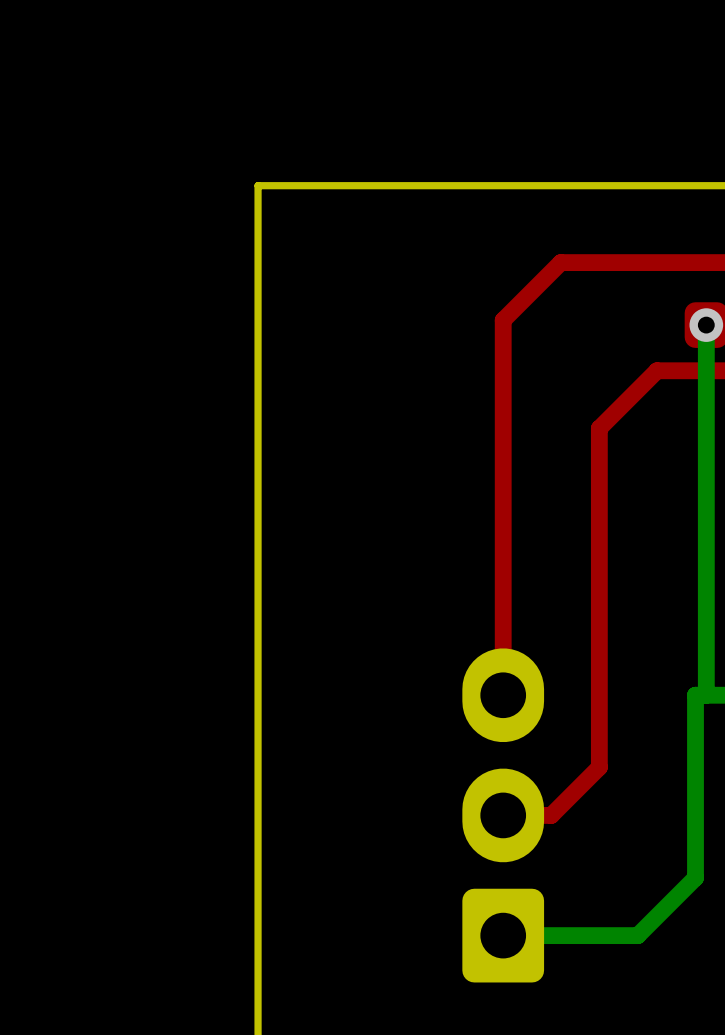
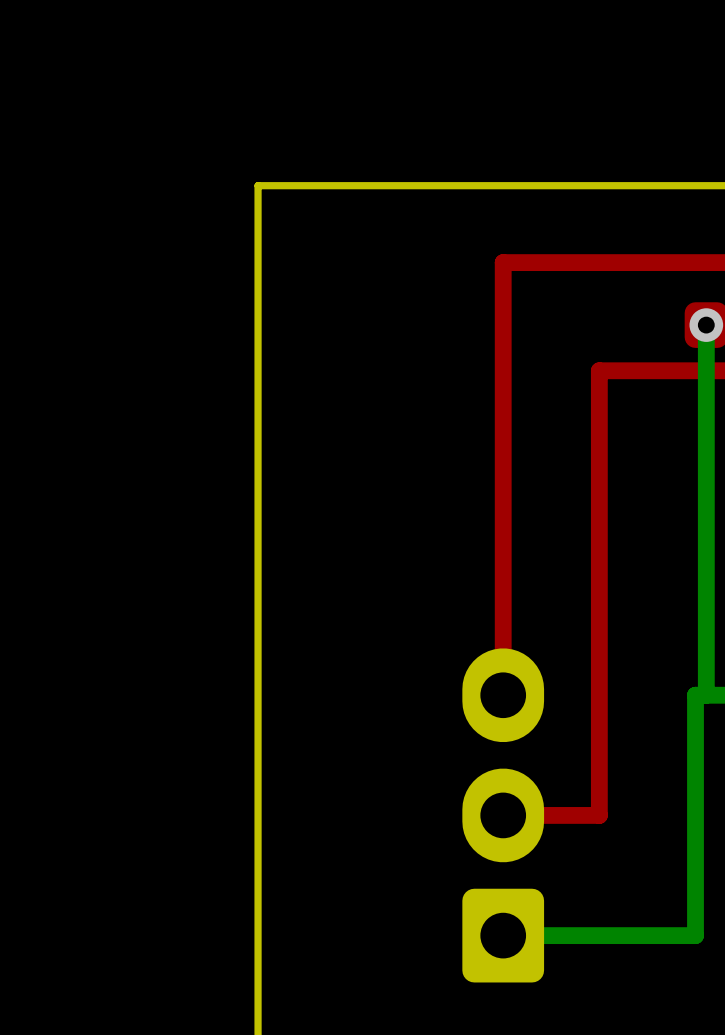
top track: (560, 262) (503, 320) -> (560, 262) (503, 262) (503, 320)
top track: (657, 370) (599, 428) -> (657, 370) (599, 370) (599, 428)
top track: (599, 767) (551, 815) -> (599, 767) (599, 815) (551, 815)
bottom track: (695, 877) (637, 935) -> (695, 877) (695, 935) (637, 935)

